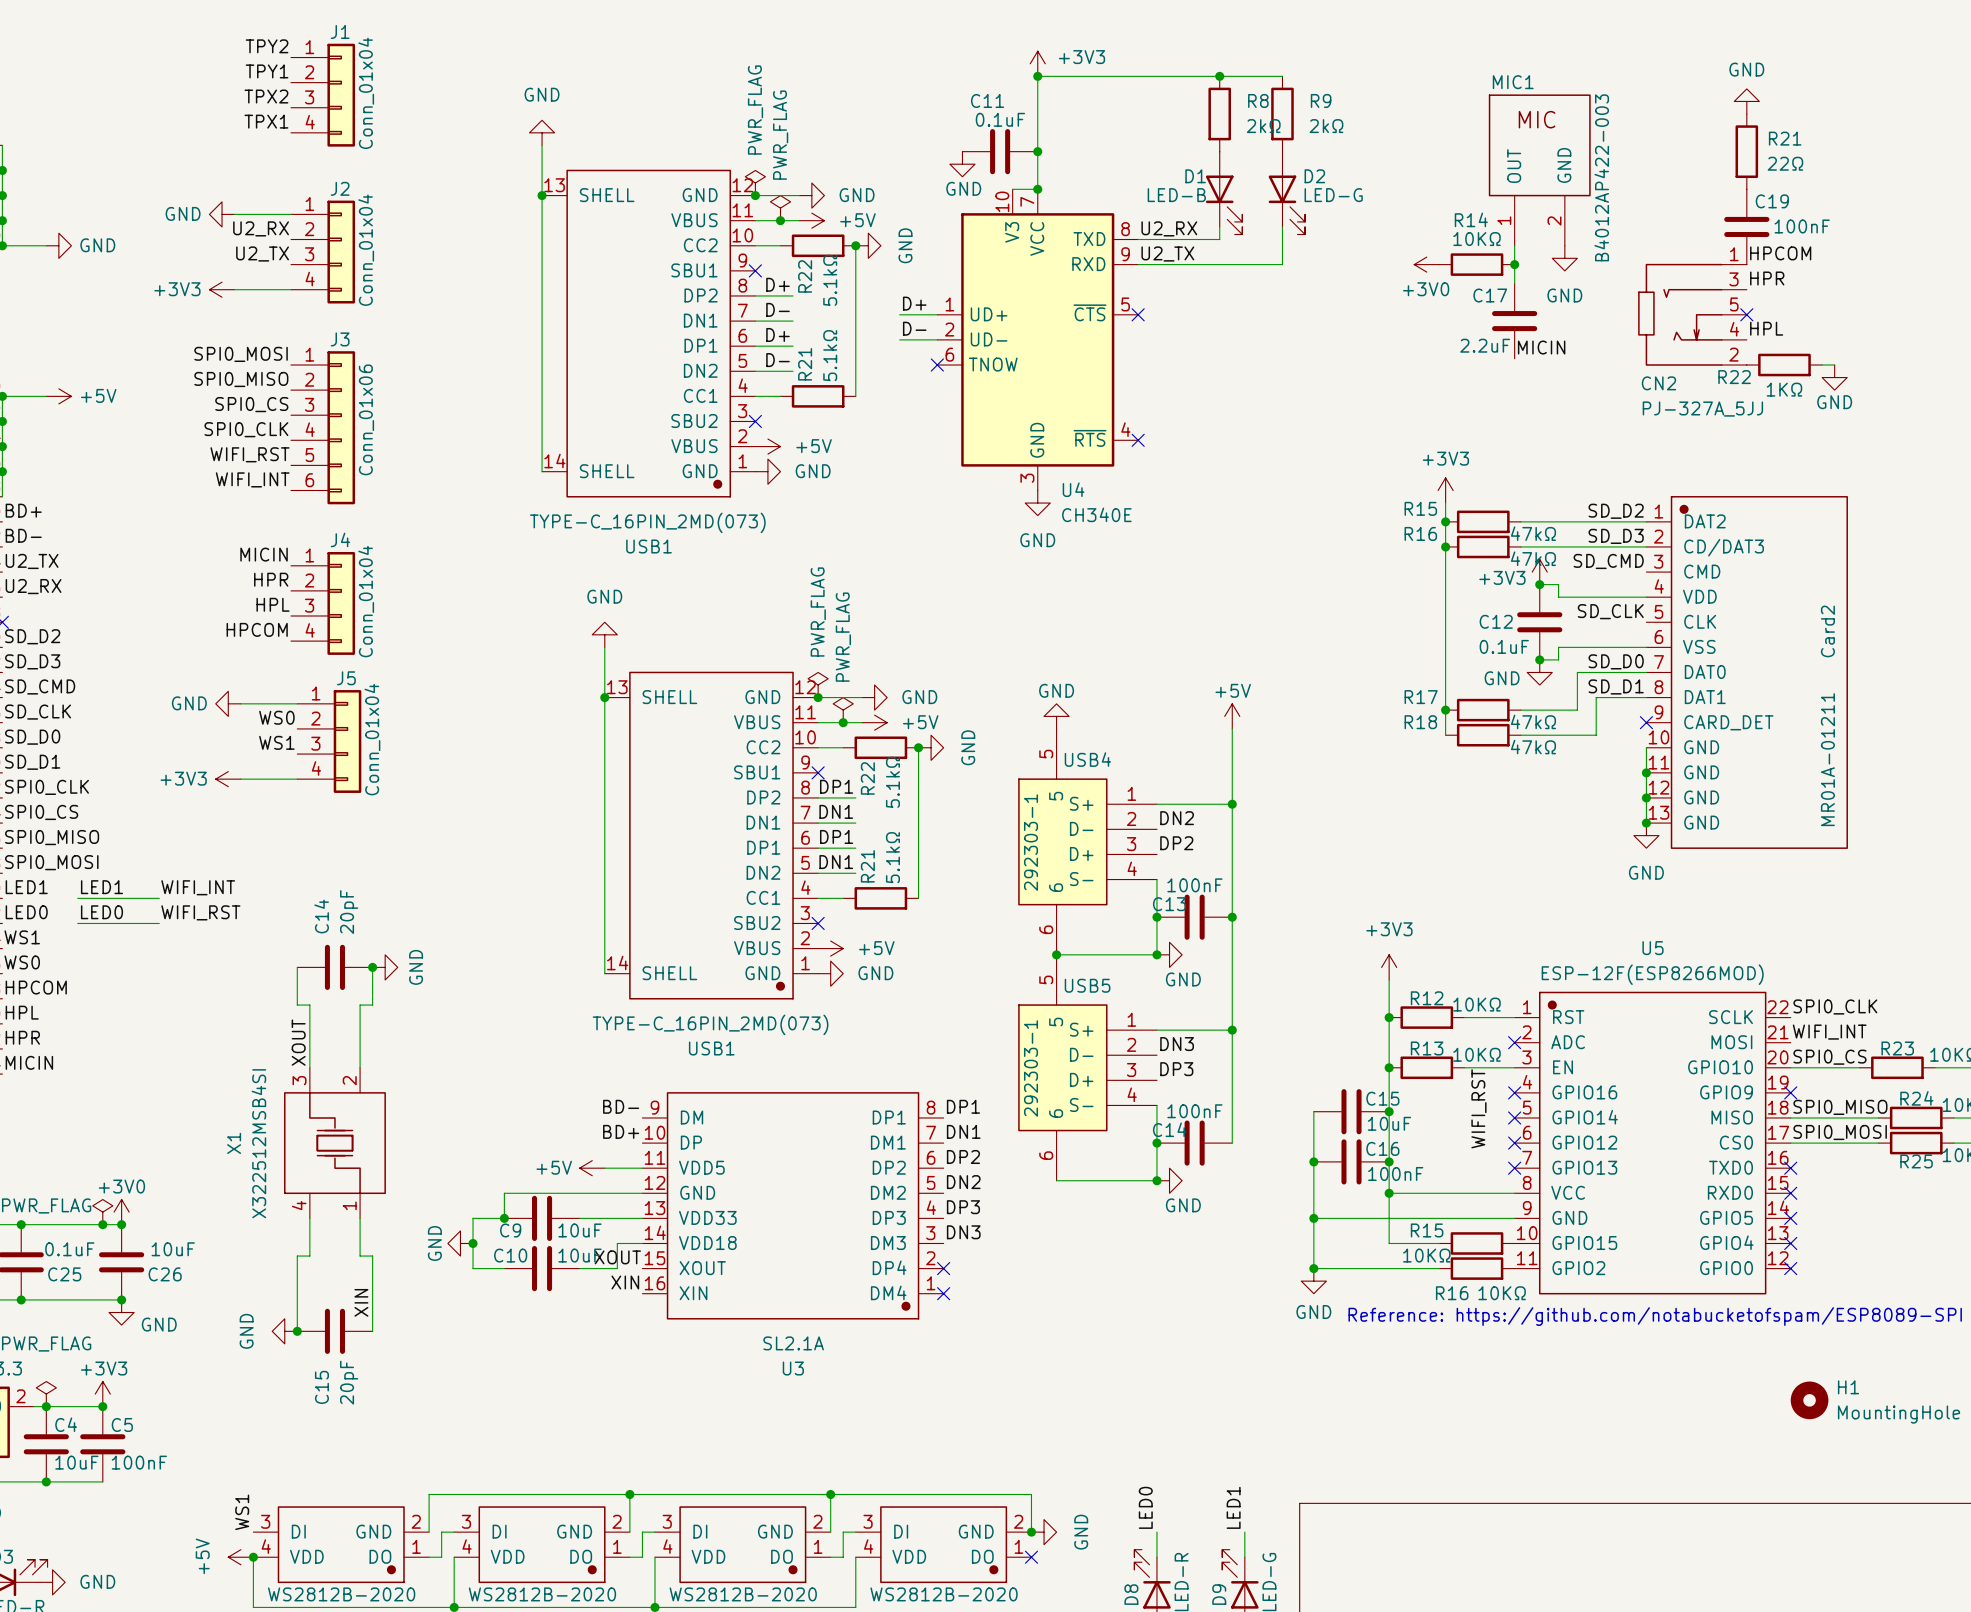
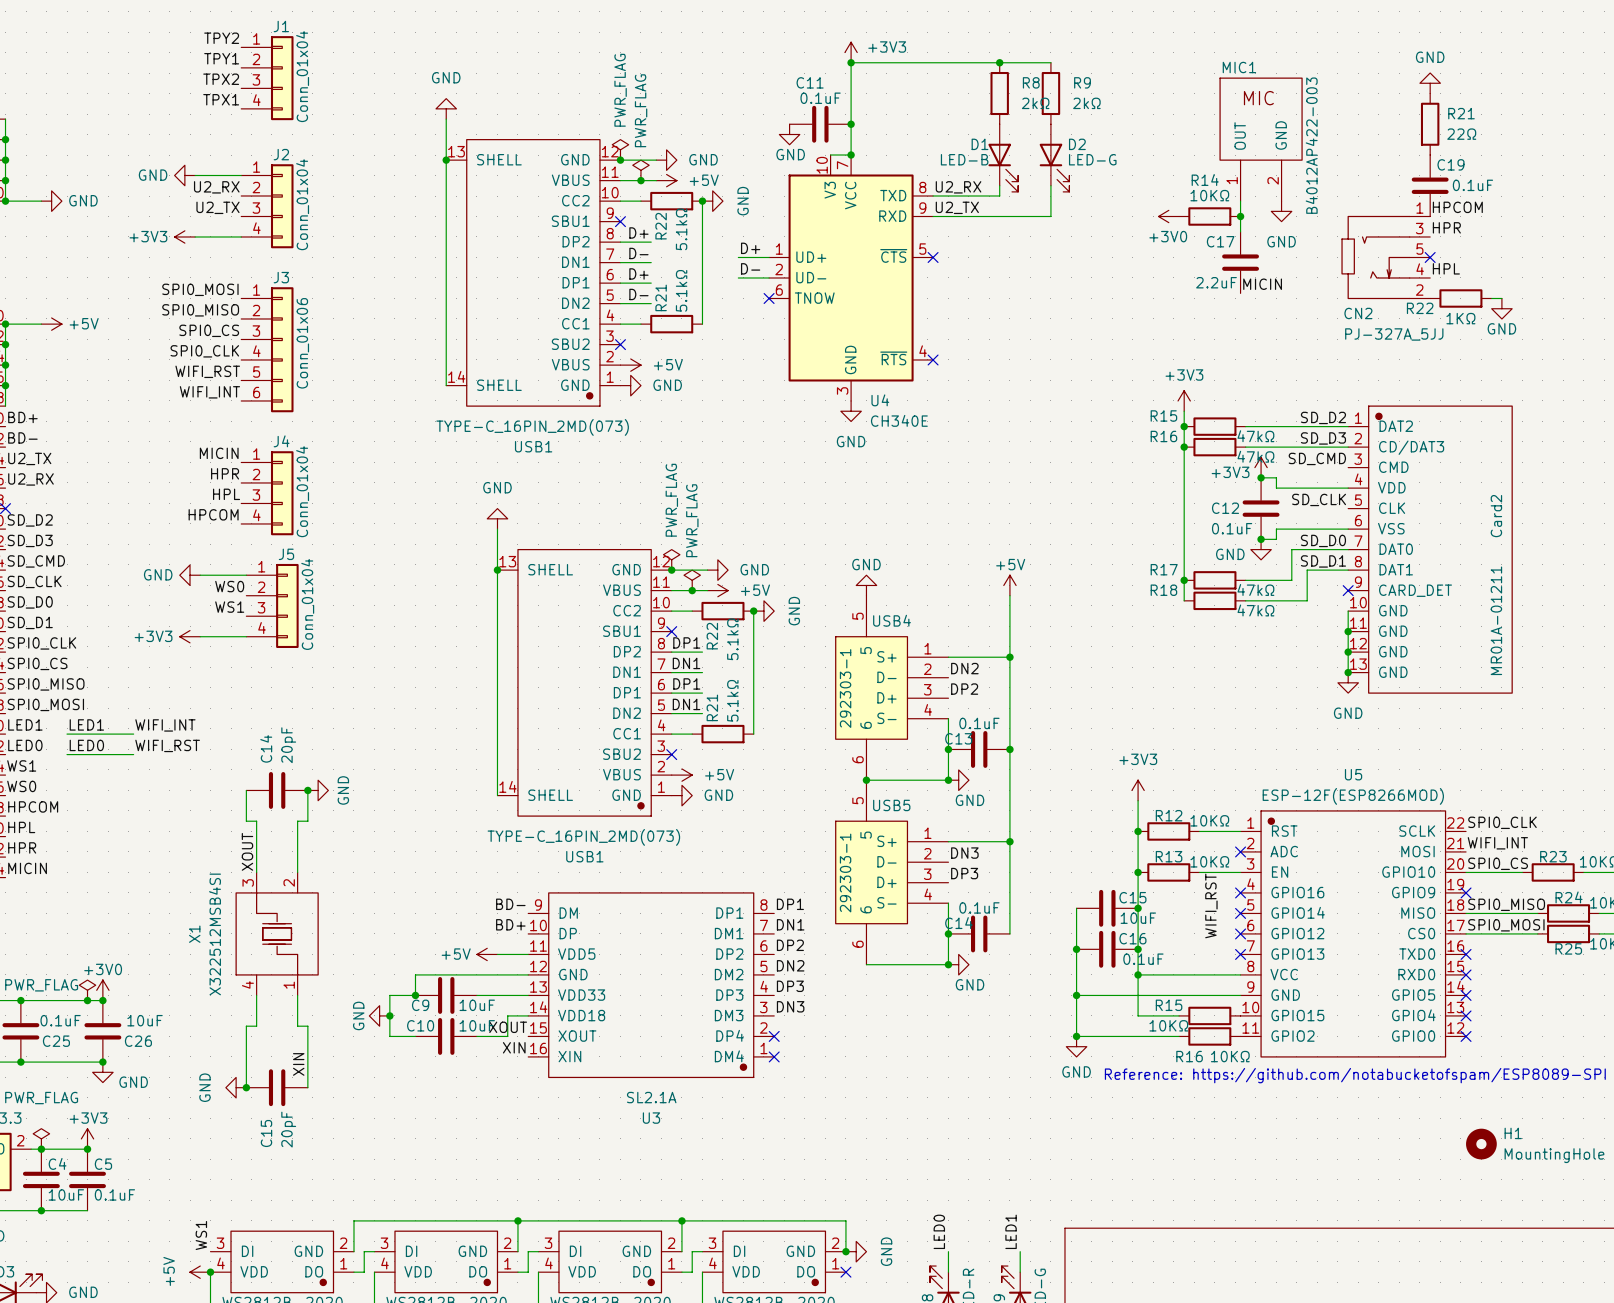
C19 value: 100nF (1802, 226) -> 0.1uF (1472, 185)
C13 value: 100nF (1194, 885) -> 0.1uF (979, 723)
C14 value: 100nF (1194, 1111) -> 0.1uF (979, 907)
C16 value: 100nF (1395, 1173) -> 0.1uF (1143, 959)
C5 value: 100nF (139, 1462) -> 0.1uF (114, 1194)

